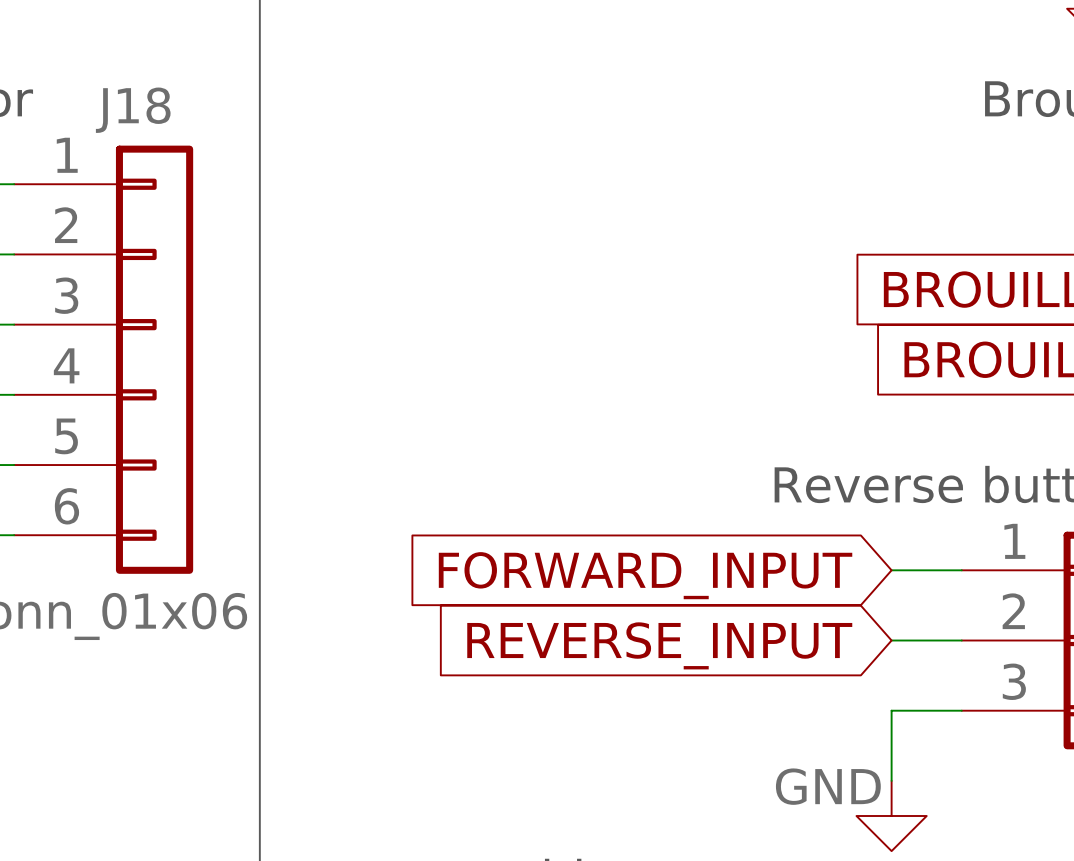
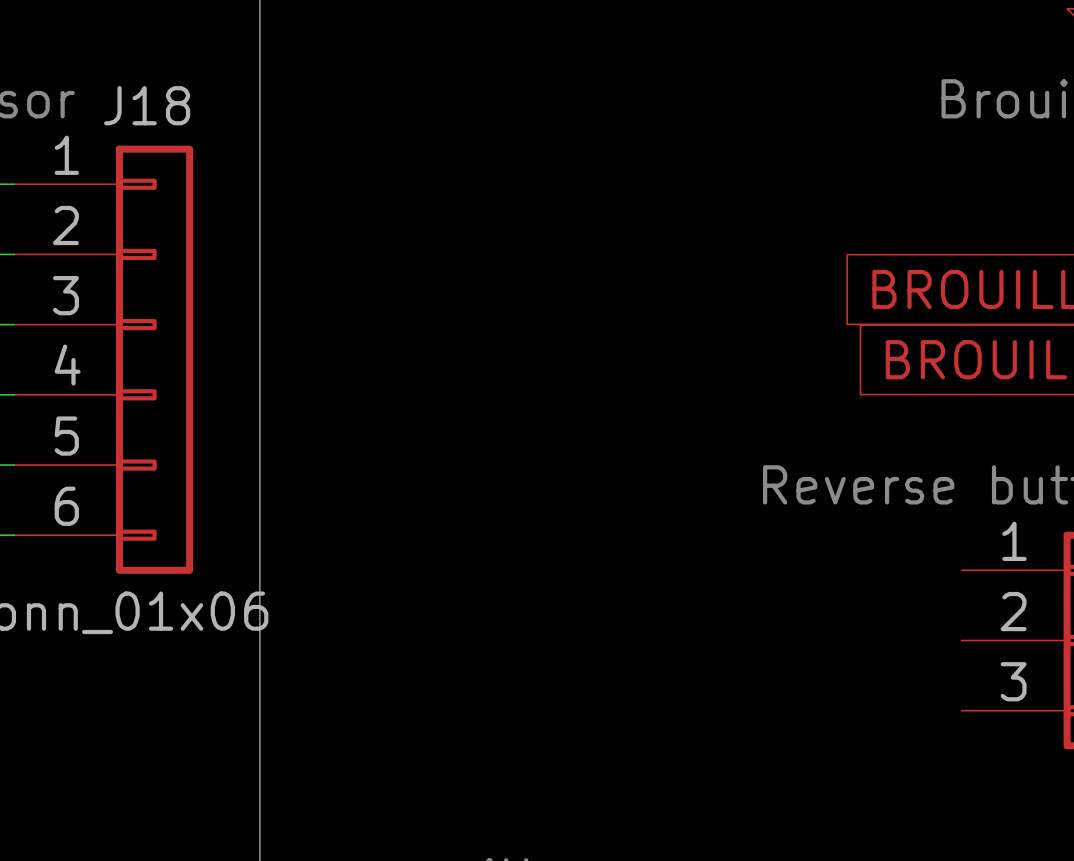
wire: (891, 570) (961, 570) -> none
global label: FORWARD_INPUT (645, 575) -> none
wire: (891, 640) (961, 640) -> none
global label: REVERSE_INPUT (659, 645) -> none
wire: (961, 710) (891, 710) (891, 780) -> none
power symbol: GND (891, 816) -> none

